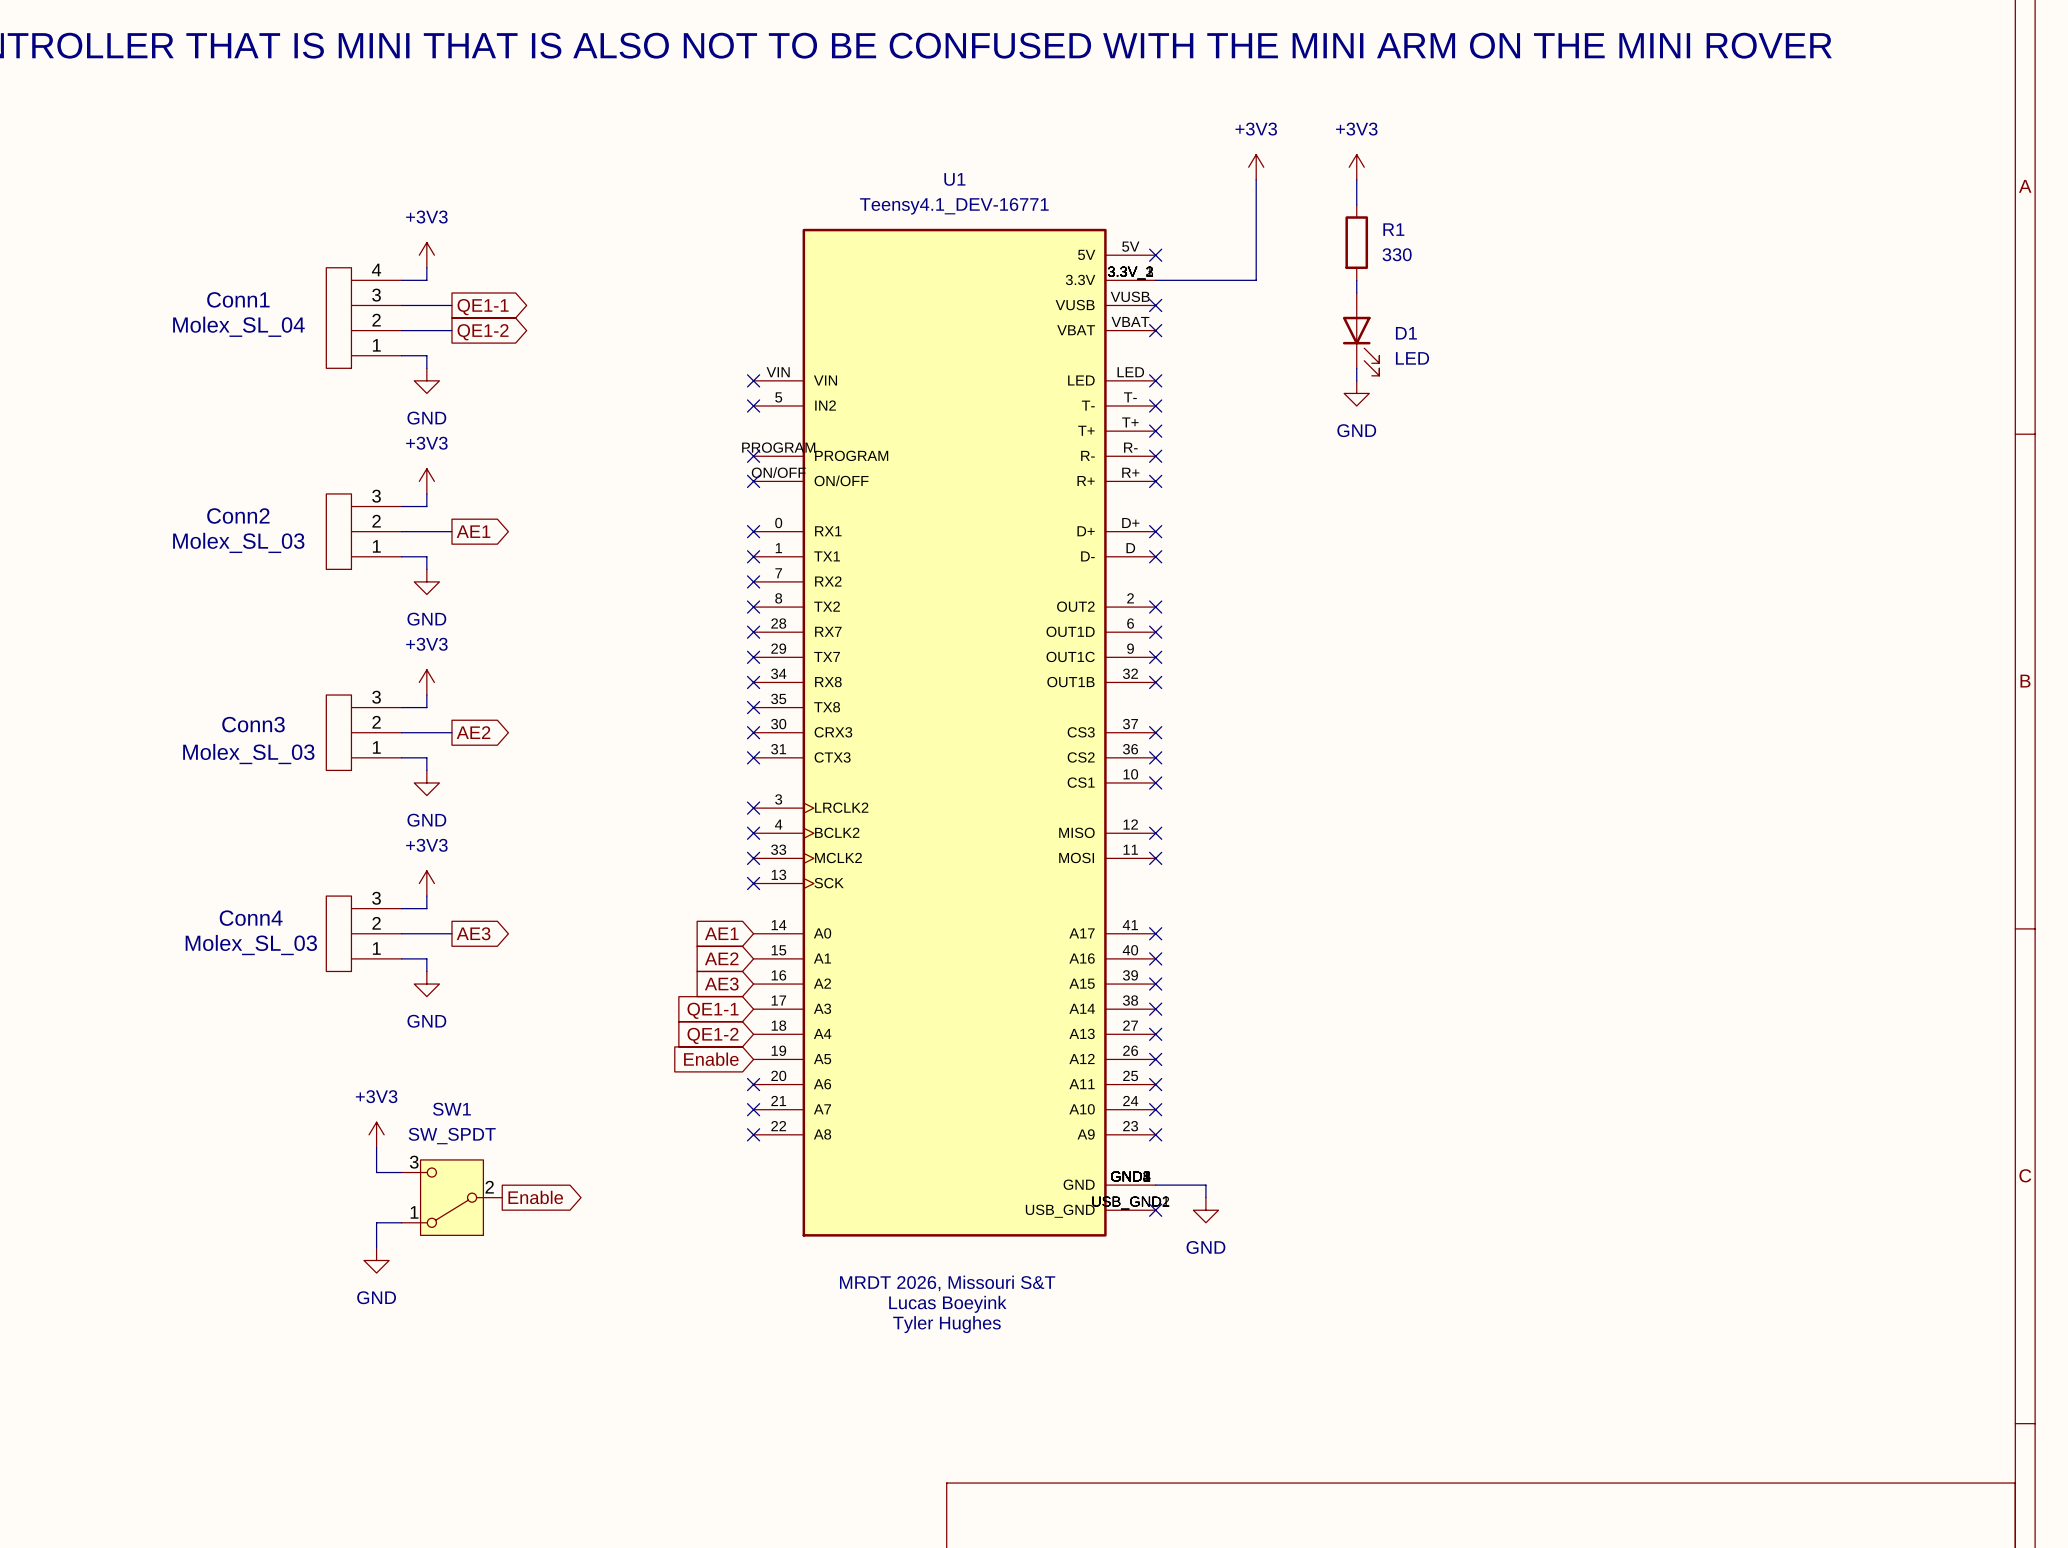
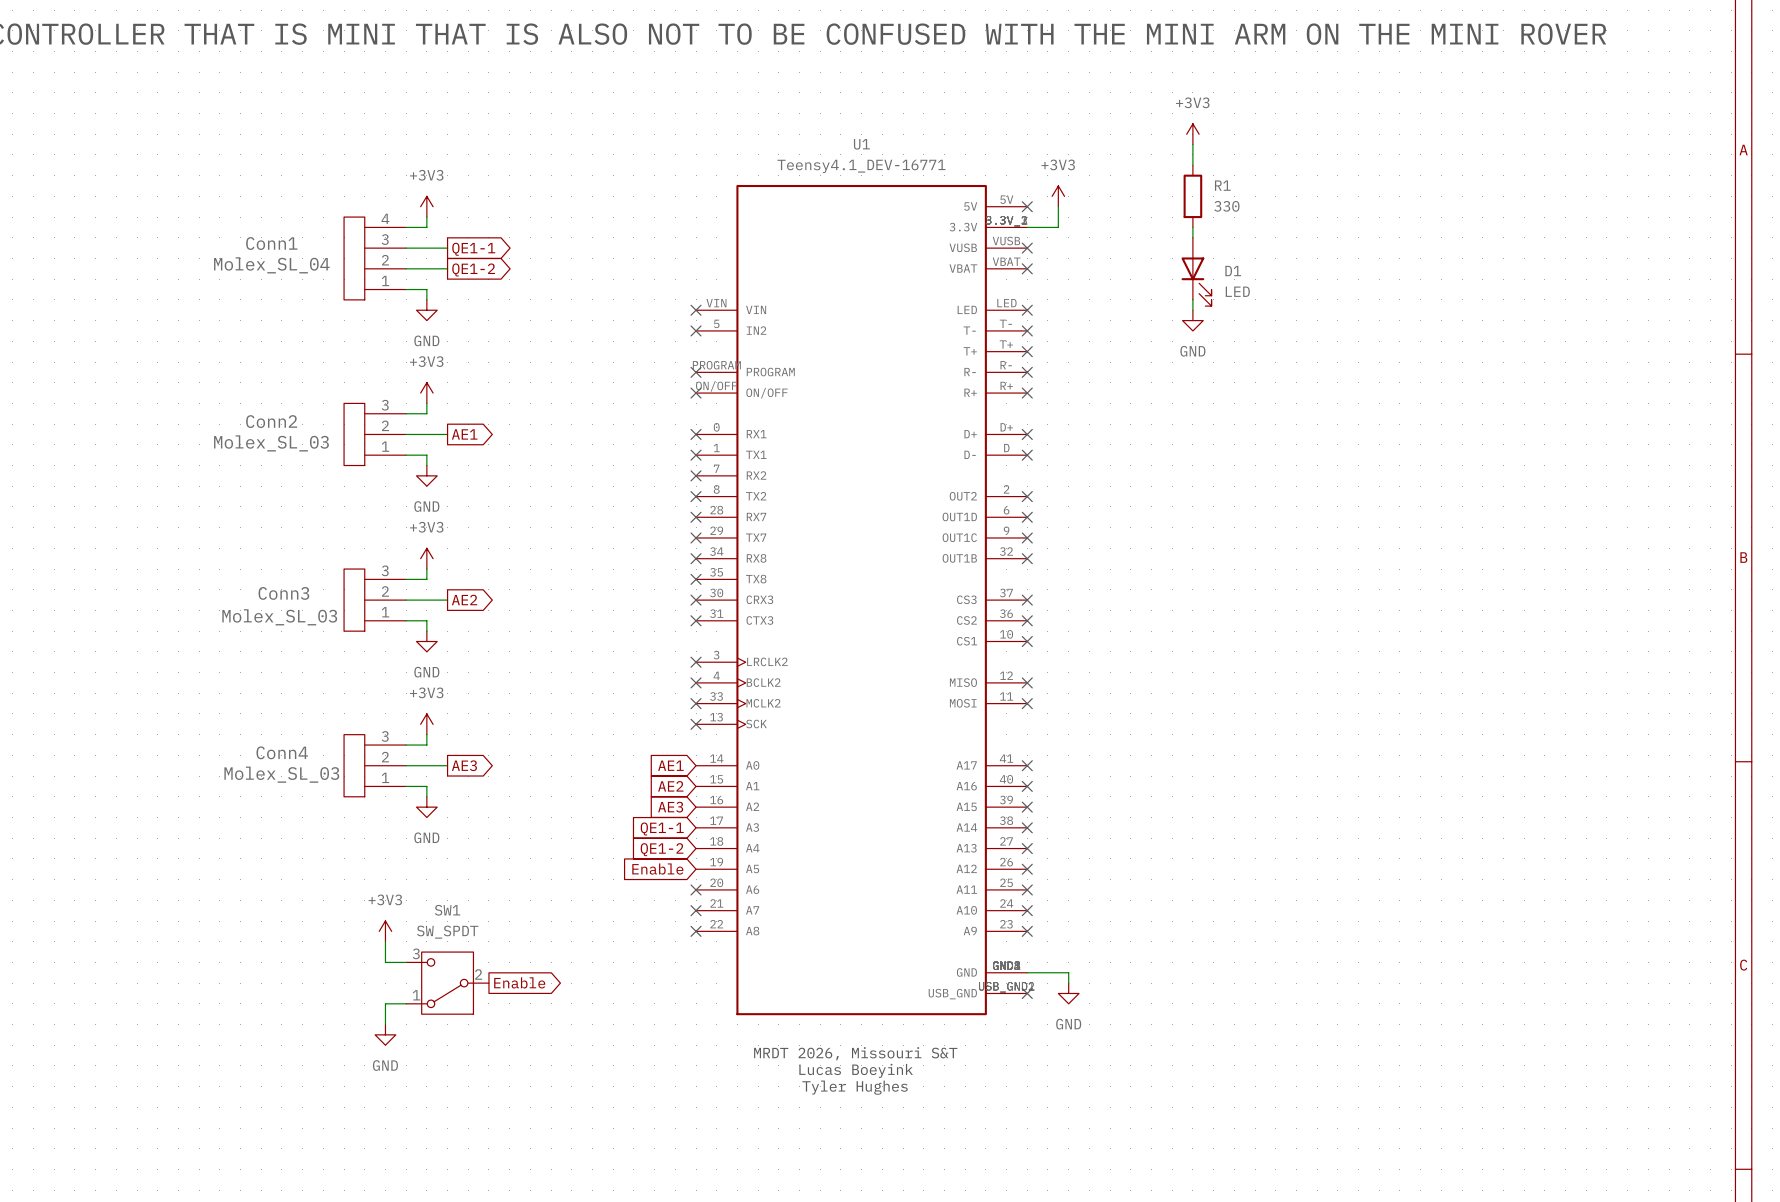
power symbol position: +3V3 (1256, 167) -> +3V3 (1058, 196)
wire: (1256, 179) (1256, 280) (1193, 280) -> (1058, 206) (1058, 227)

